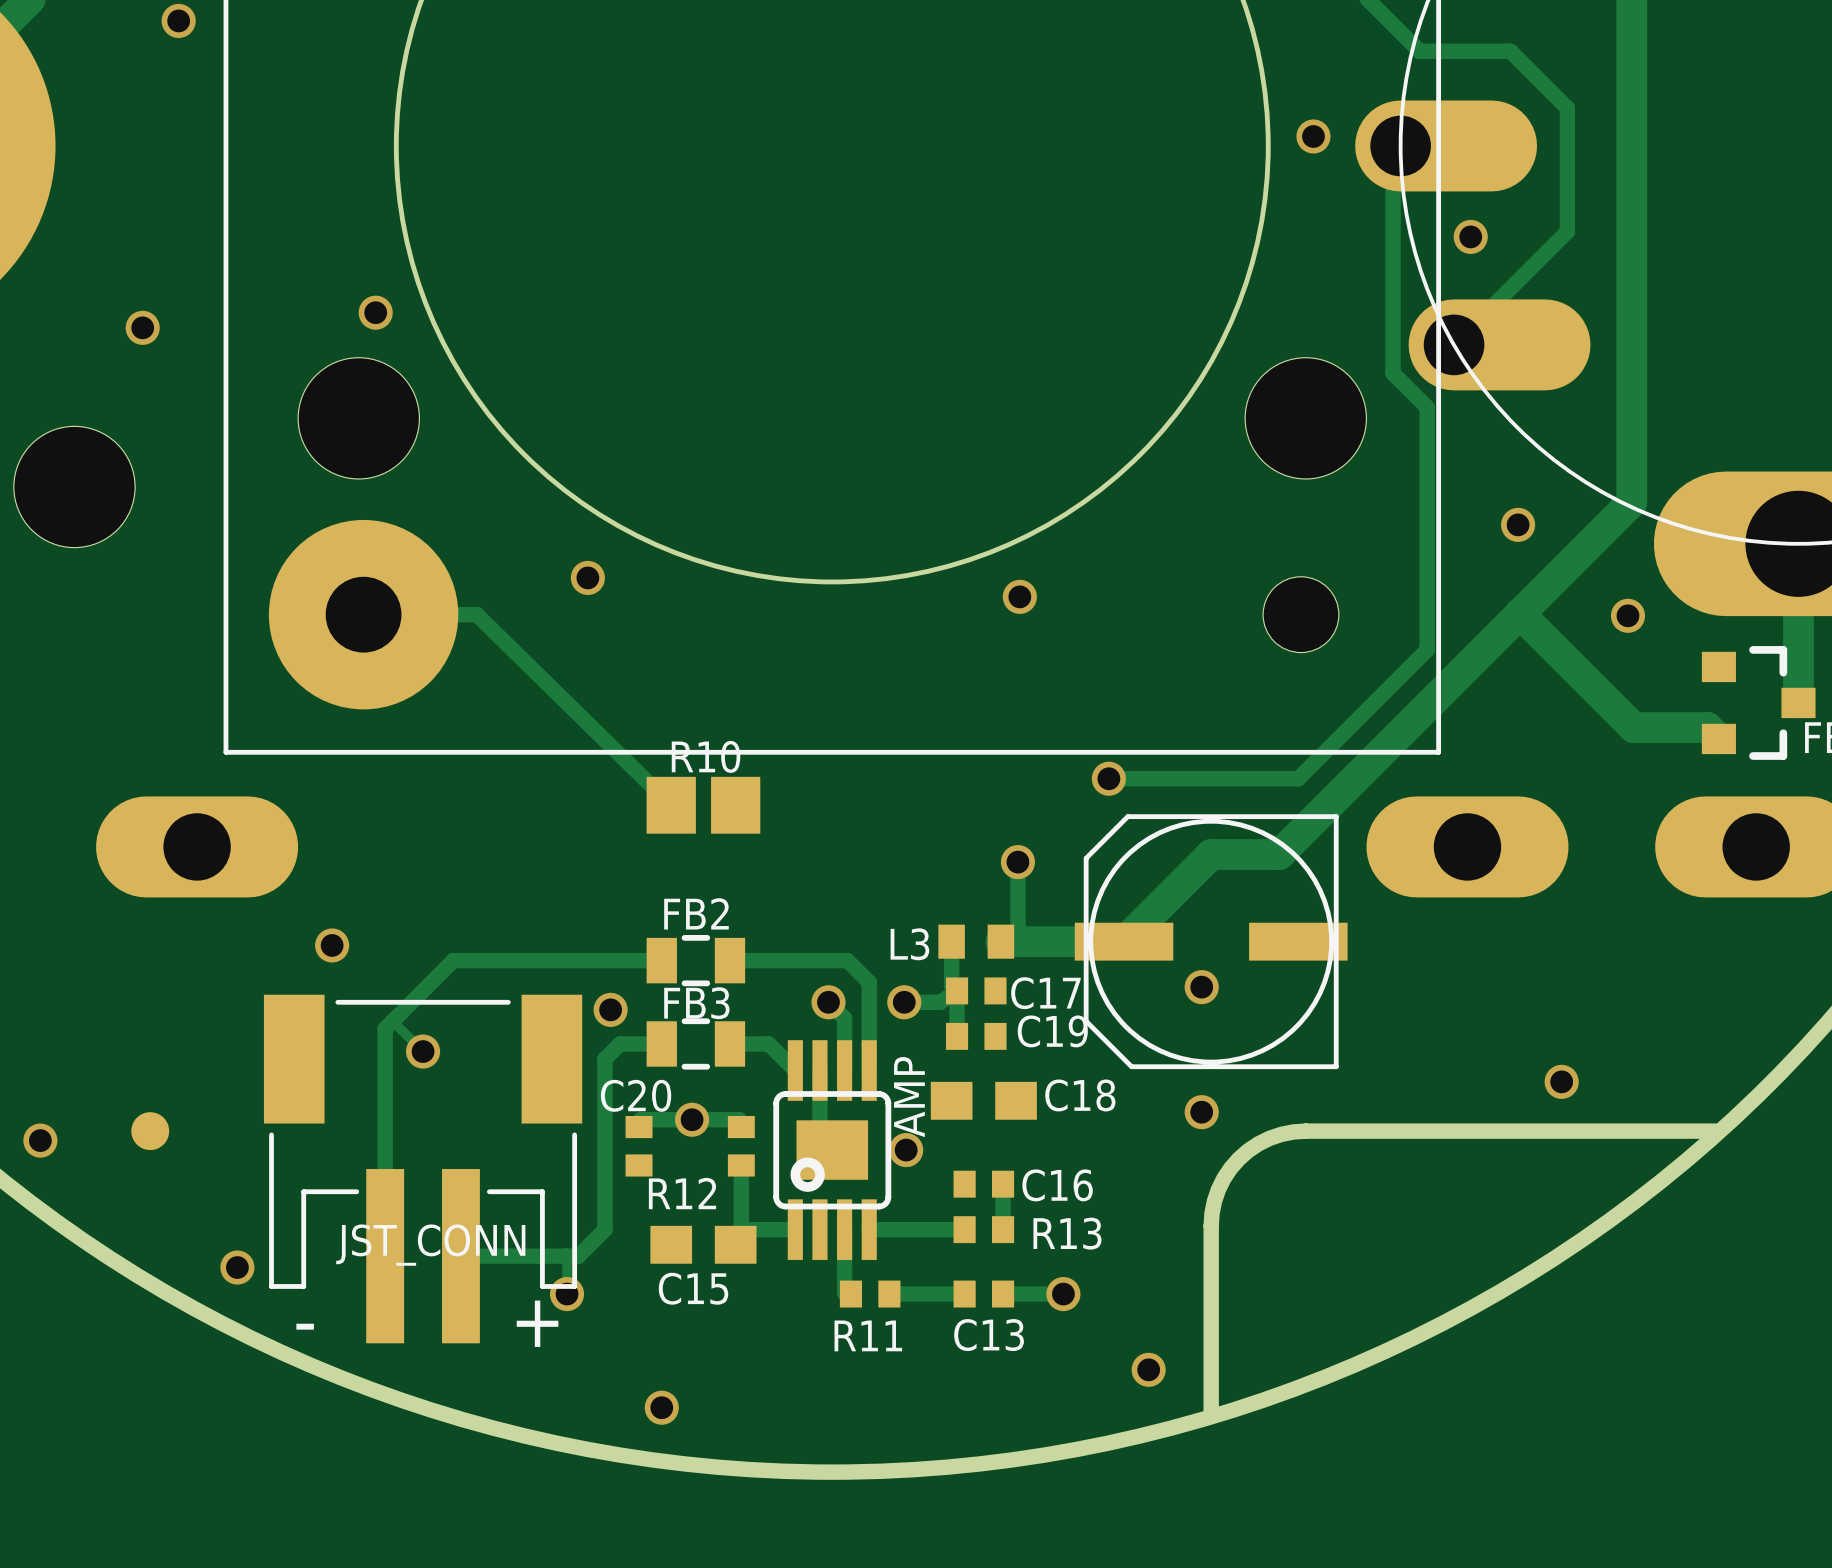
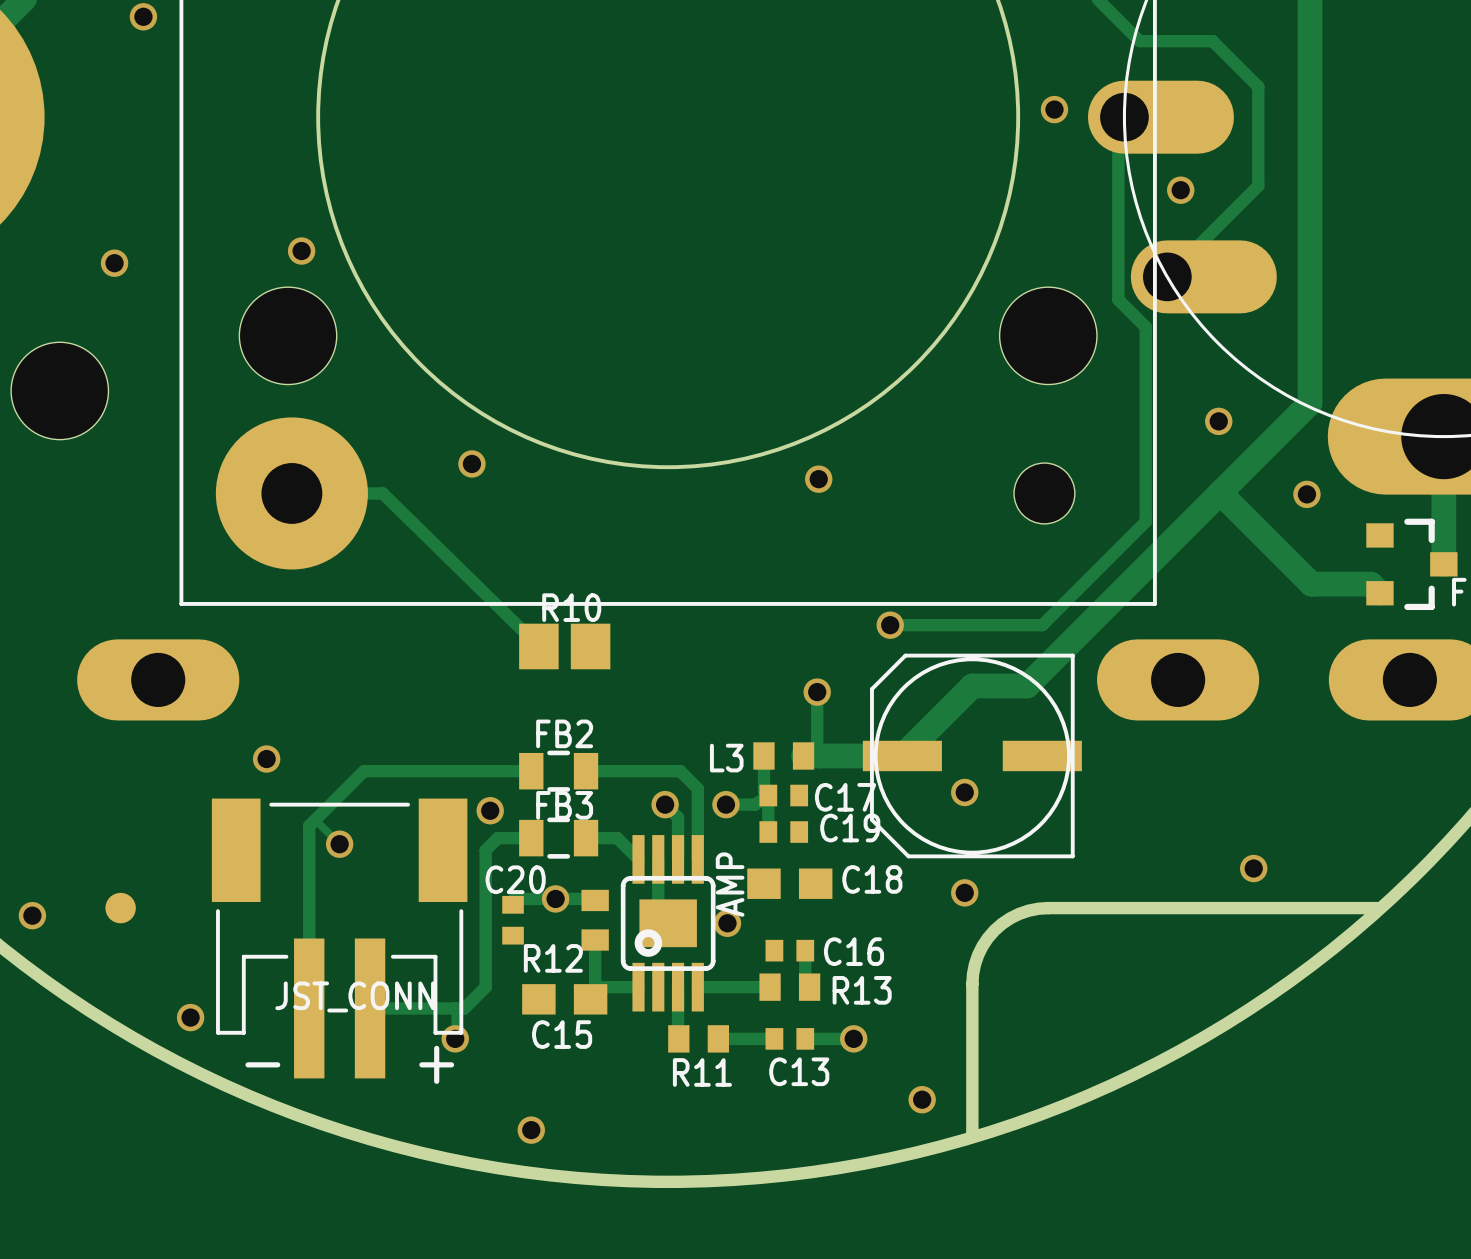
R12 footprint: [727, 1115, 755, 1177] -> [581, 889, 609, 951]
R13 footprint: [953, 1216, 1015, 1244] -> [759, 973, 821, 1001]
R11 footprint: [839, 1280, 901, 1308] -> [668, 1025, 730, 1053]

